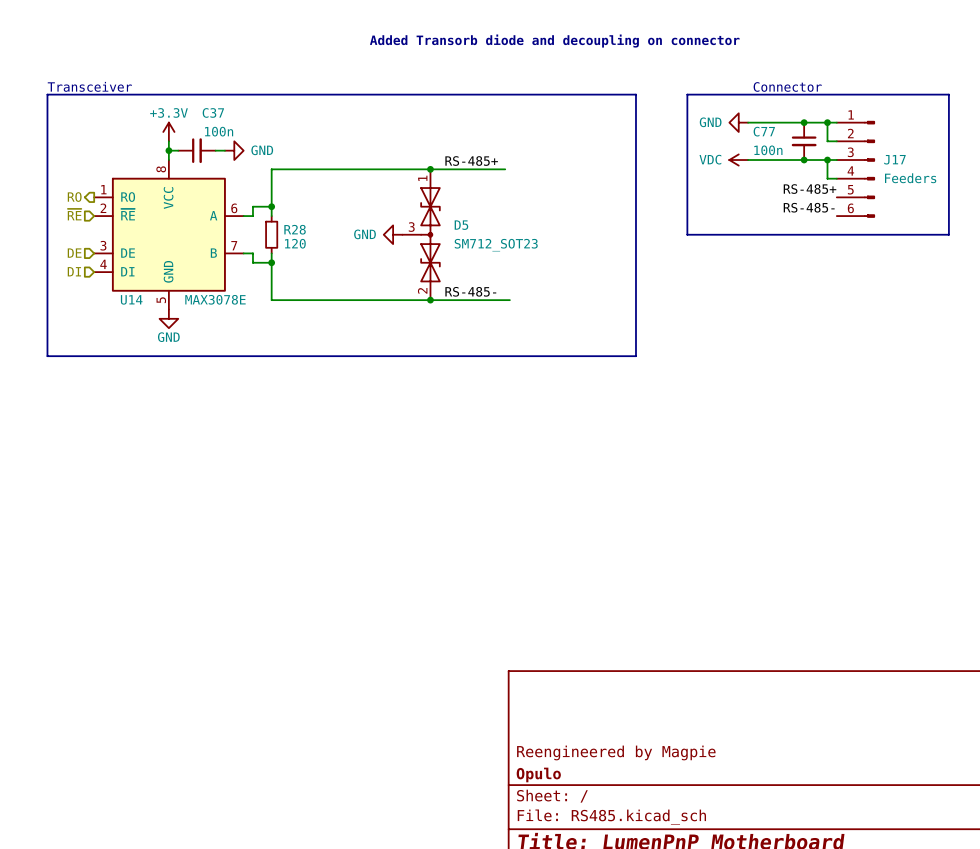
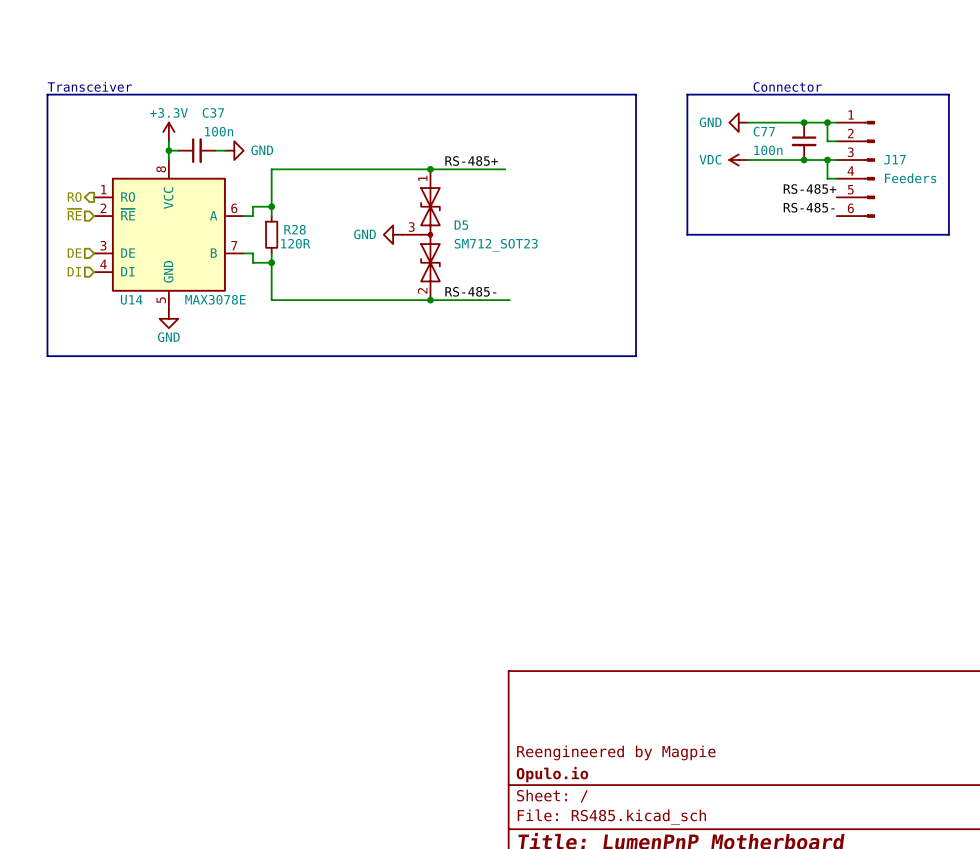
text: Added Transorb diode and decoupling on connector (554, 41) -> none
R28 value: 120 (295, 243) -> 120R (295, 243)
title block: Opulo (538, 774) -> Opulo.io (552, 774)

